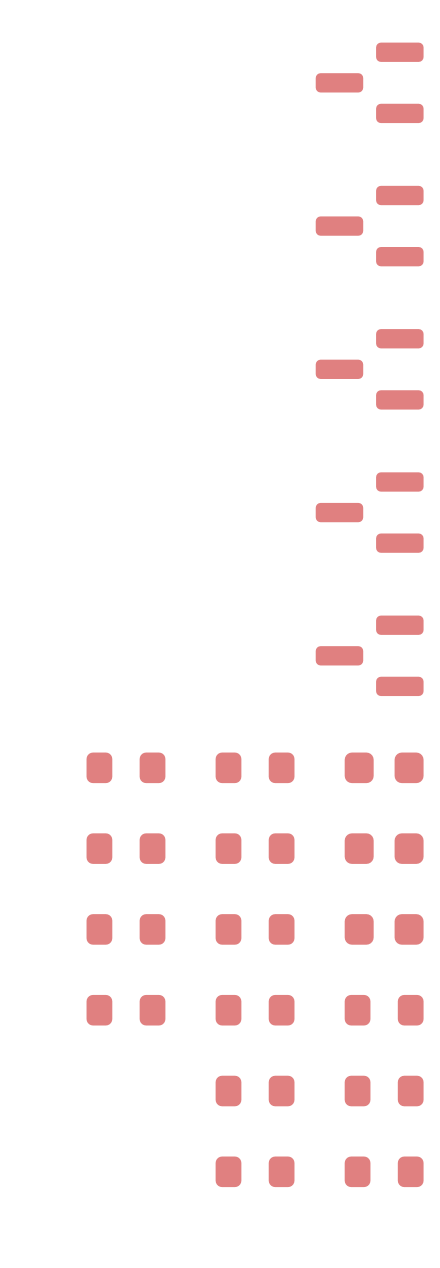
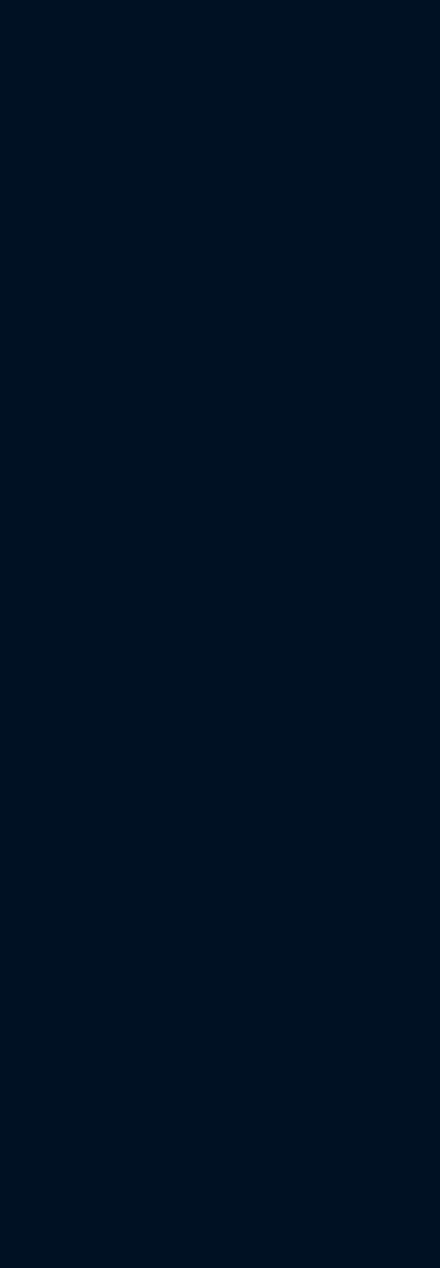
part: (369, 82) -> none
part: (369, 226) -> none
part: (369, 369) -> none
part: (369, 512) -> none
part: (369, 655) -> none
part: (125, 767) -> none
part: (255, 767) -> none
part: (384, 767) -> none
part: (125, 848) -> none
part: (255, 848) -> none
part: (384, 848) -> none
part: (125, 929) -> none
part: (255, 929) -> none
part: (384, 929) -> none
part: (125, 1010) -> none
part: (255, 1010) -> none
part: (384, 1010) -> none
part: (255, 1091) -> none
part: (384, 1091) -> none
part: (255, 1171) -> none
part: (384, 1171) -> none

